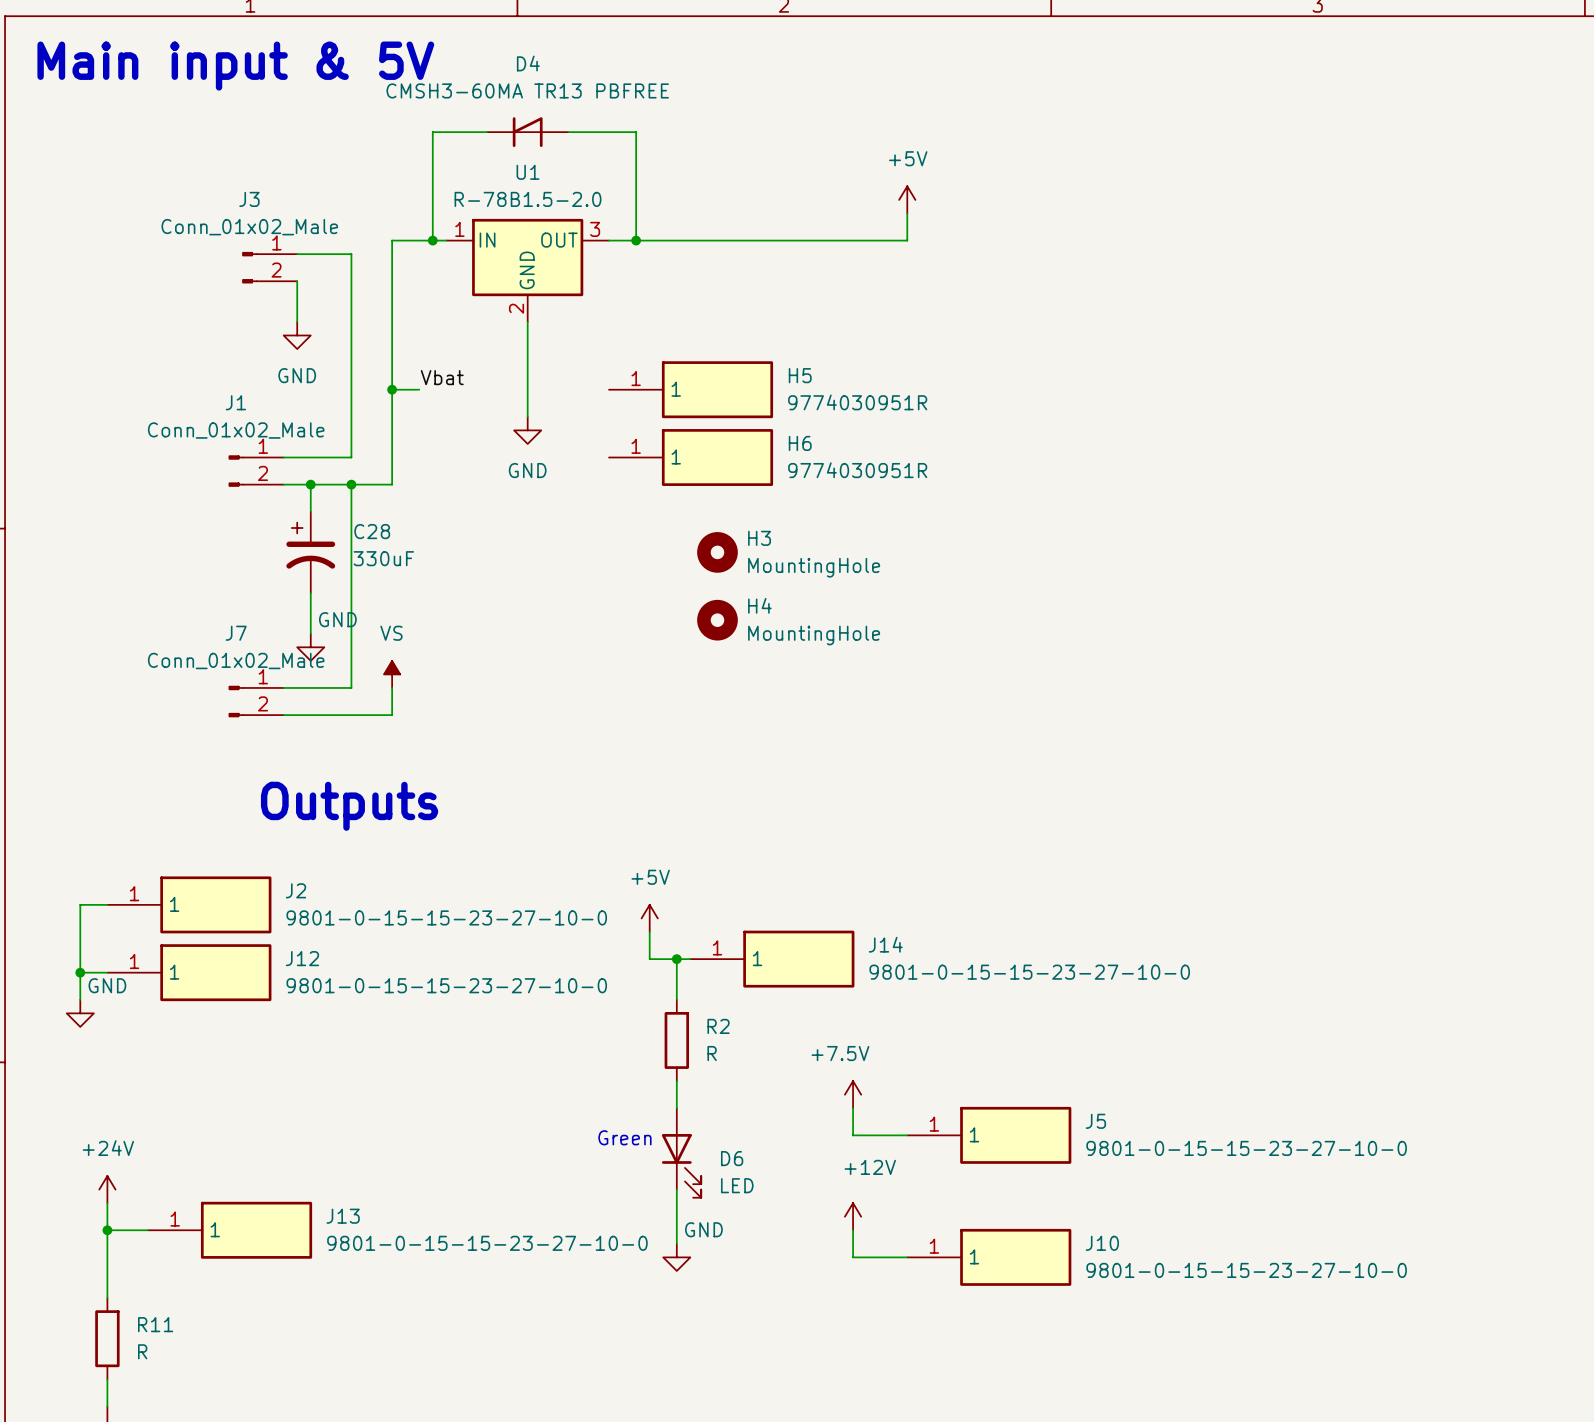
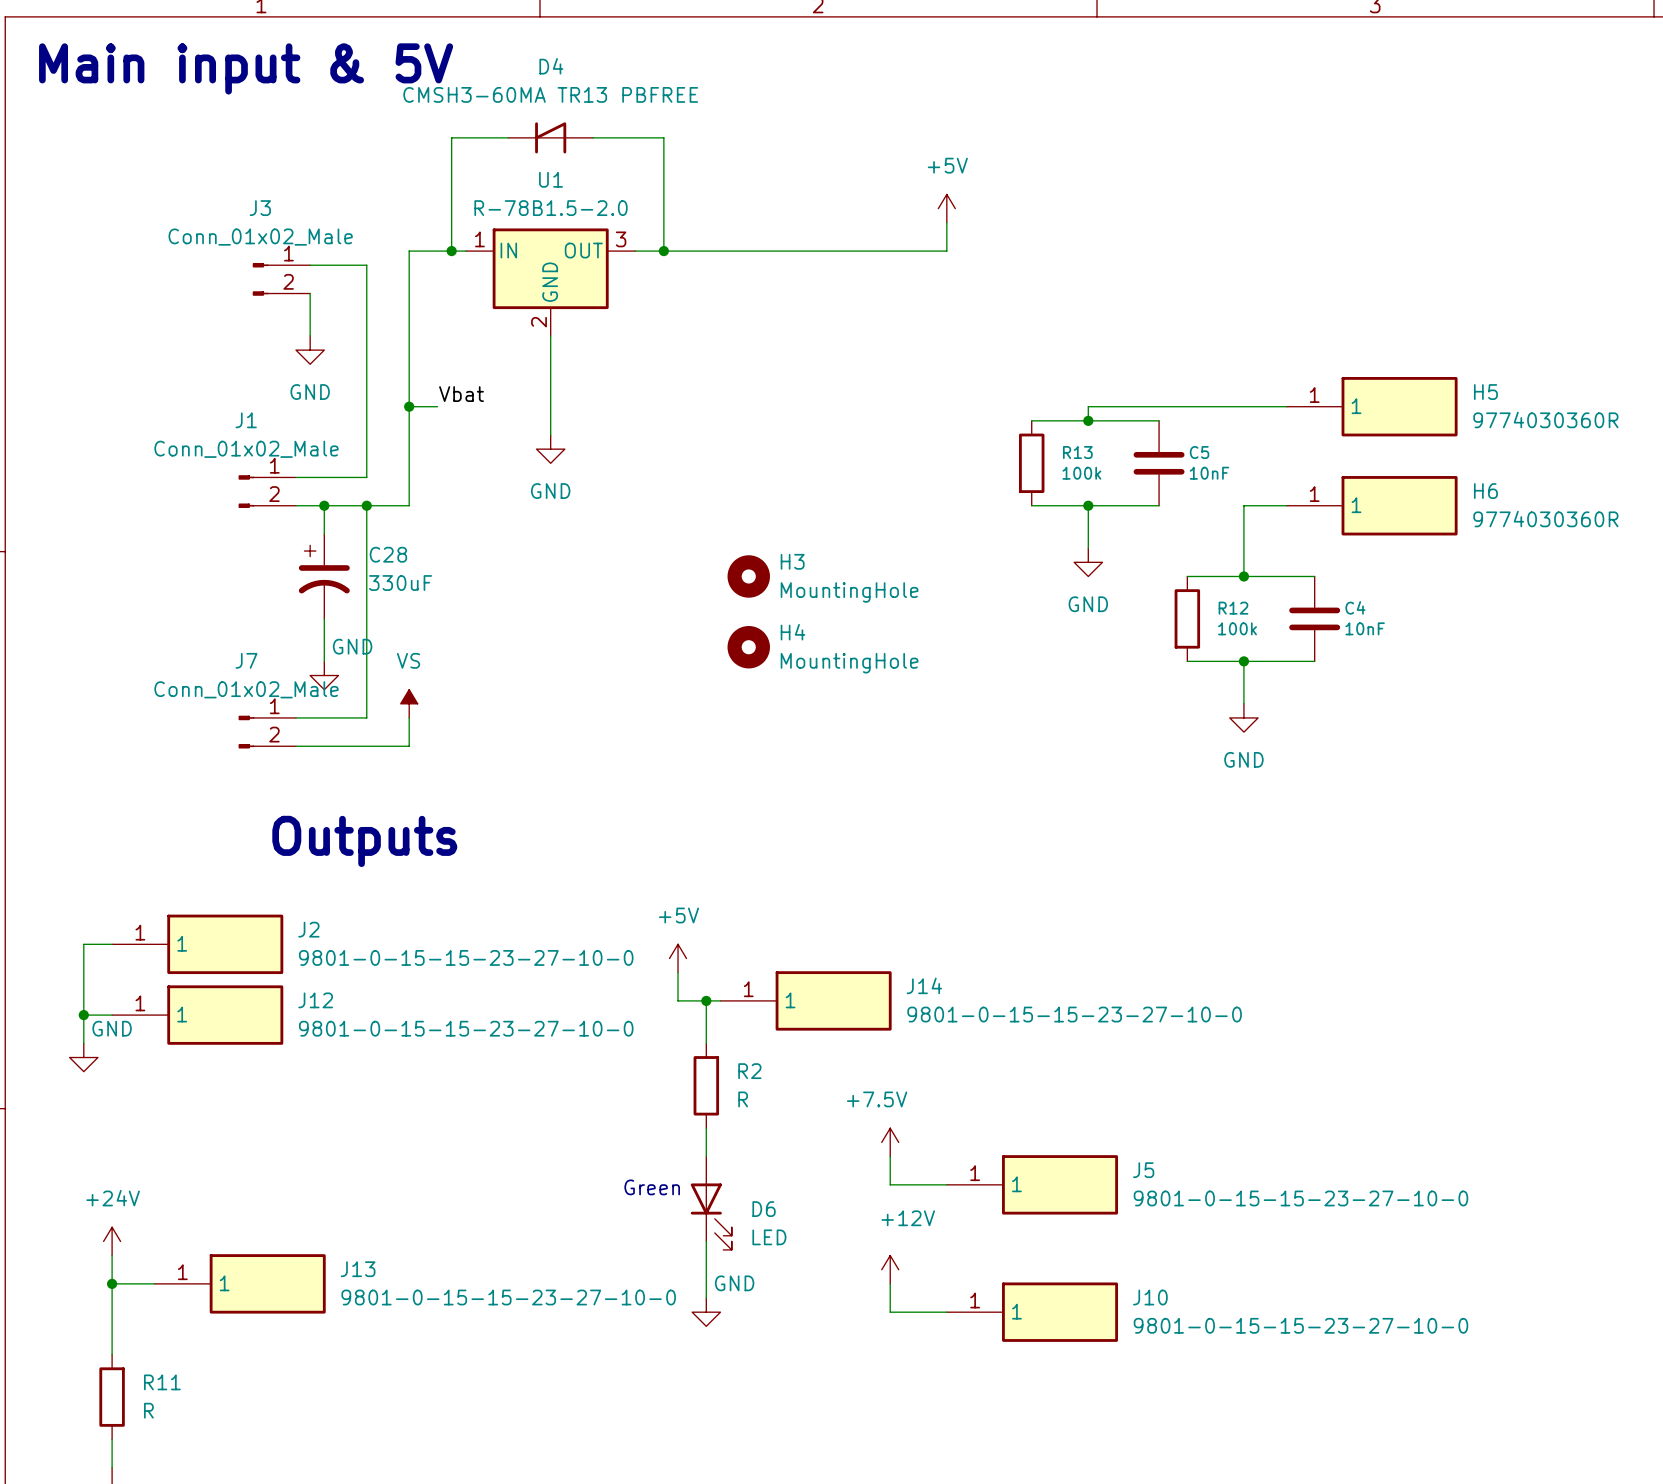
H5 position: (691, 389) -> (1371, 406)
wire: none -> (1286, 406) (1088, 406) (1088, 420)
H5 value: 9774030951R (857, 402) -> 9774030360R (1545, 419)
wire: none -> (1031, 420) (1159, 420)
junction: none -> (1088, 420)
R13: none -> 100k (1031, 463)
C5: none -> 10nF (1159, 463)
H6 position: (691, 457) -> (1371, 505)
H6 value: 9774030951R (857, 470) -> 9774030360R (1545, 519)
wire: none -> (1031, 505) (1159, 505)
wire: none -> (1088, 505) (1088, 548)
junction: none -> (1088, 505)
wire: none -> (1286, 505) (1243, 505) (1243, 576)
power symbol: none -> GND (1088, 562)
wire: none -> (1187, 576) (1314, 576)
junction: none -> (1243, 576)
R12: none -> 100k (1187, 618)
C4: none -> 10nF (1314, 618)
wire: none -> (1187, 661) (1314, 661)
wire: none -> (1243, 661) (1243, 703)
junction: none -> (1243, 661)
power symbol: none -> GND (1243, 717)

